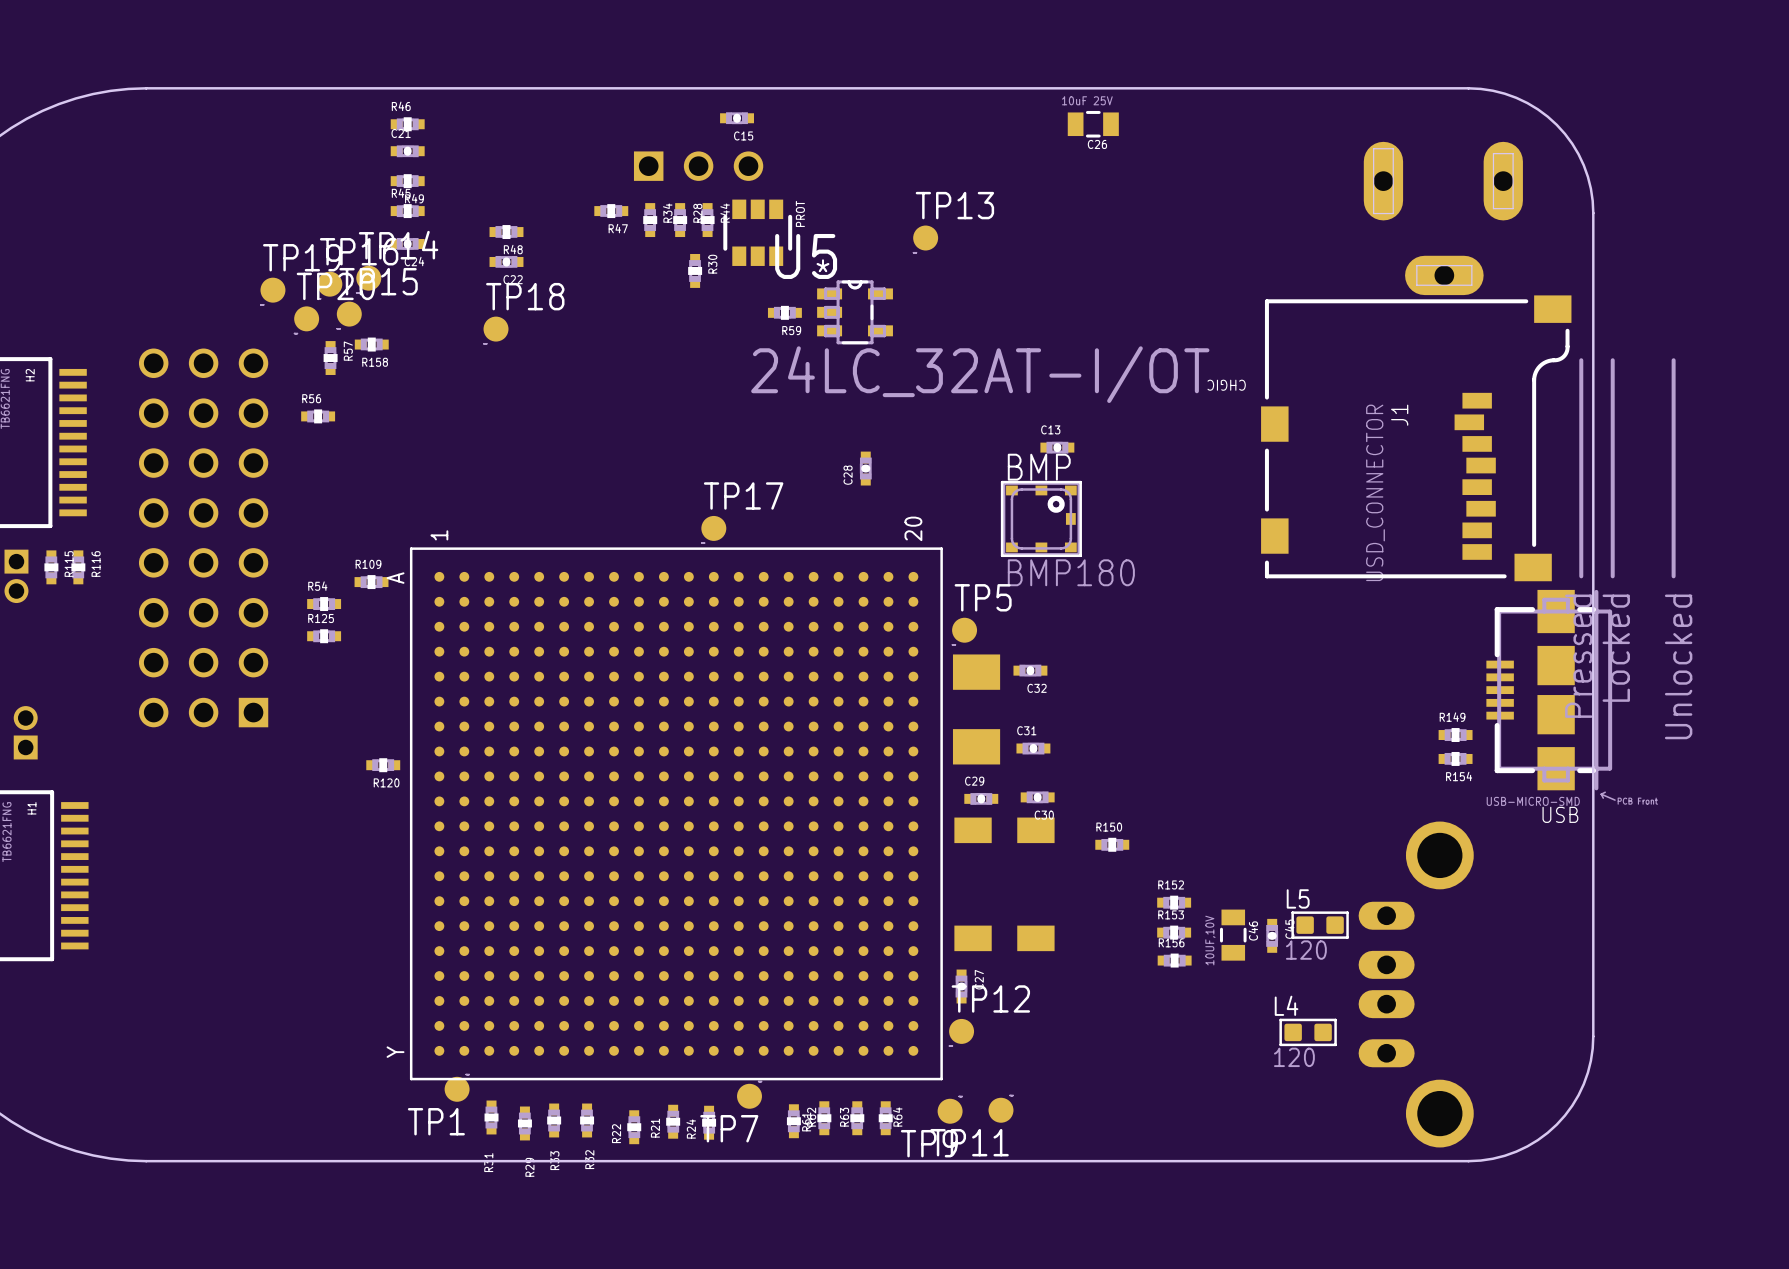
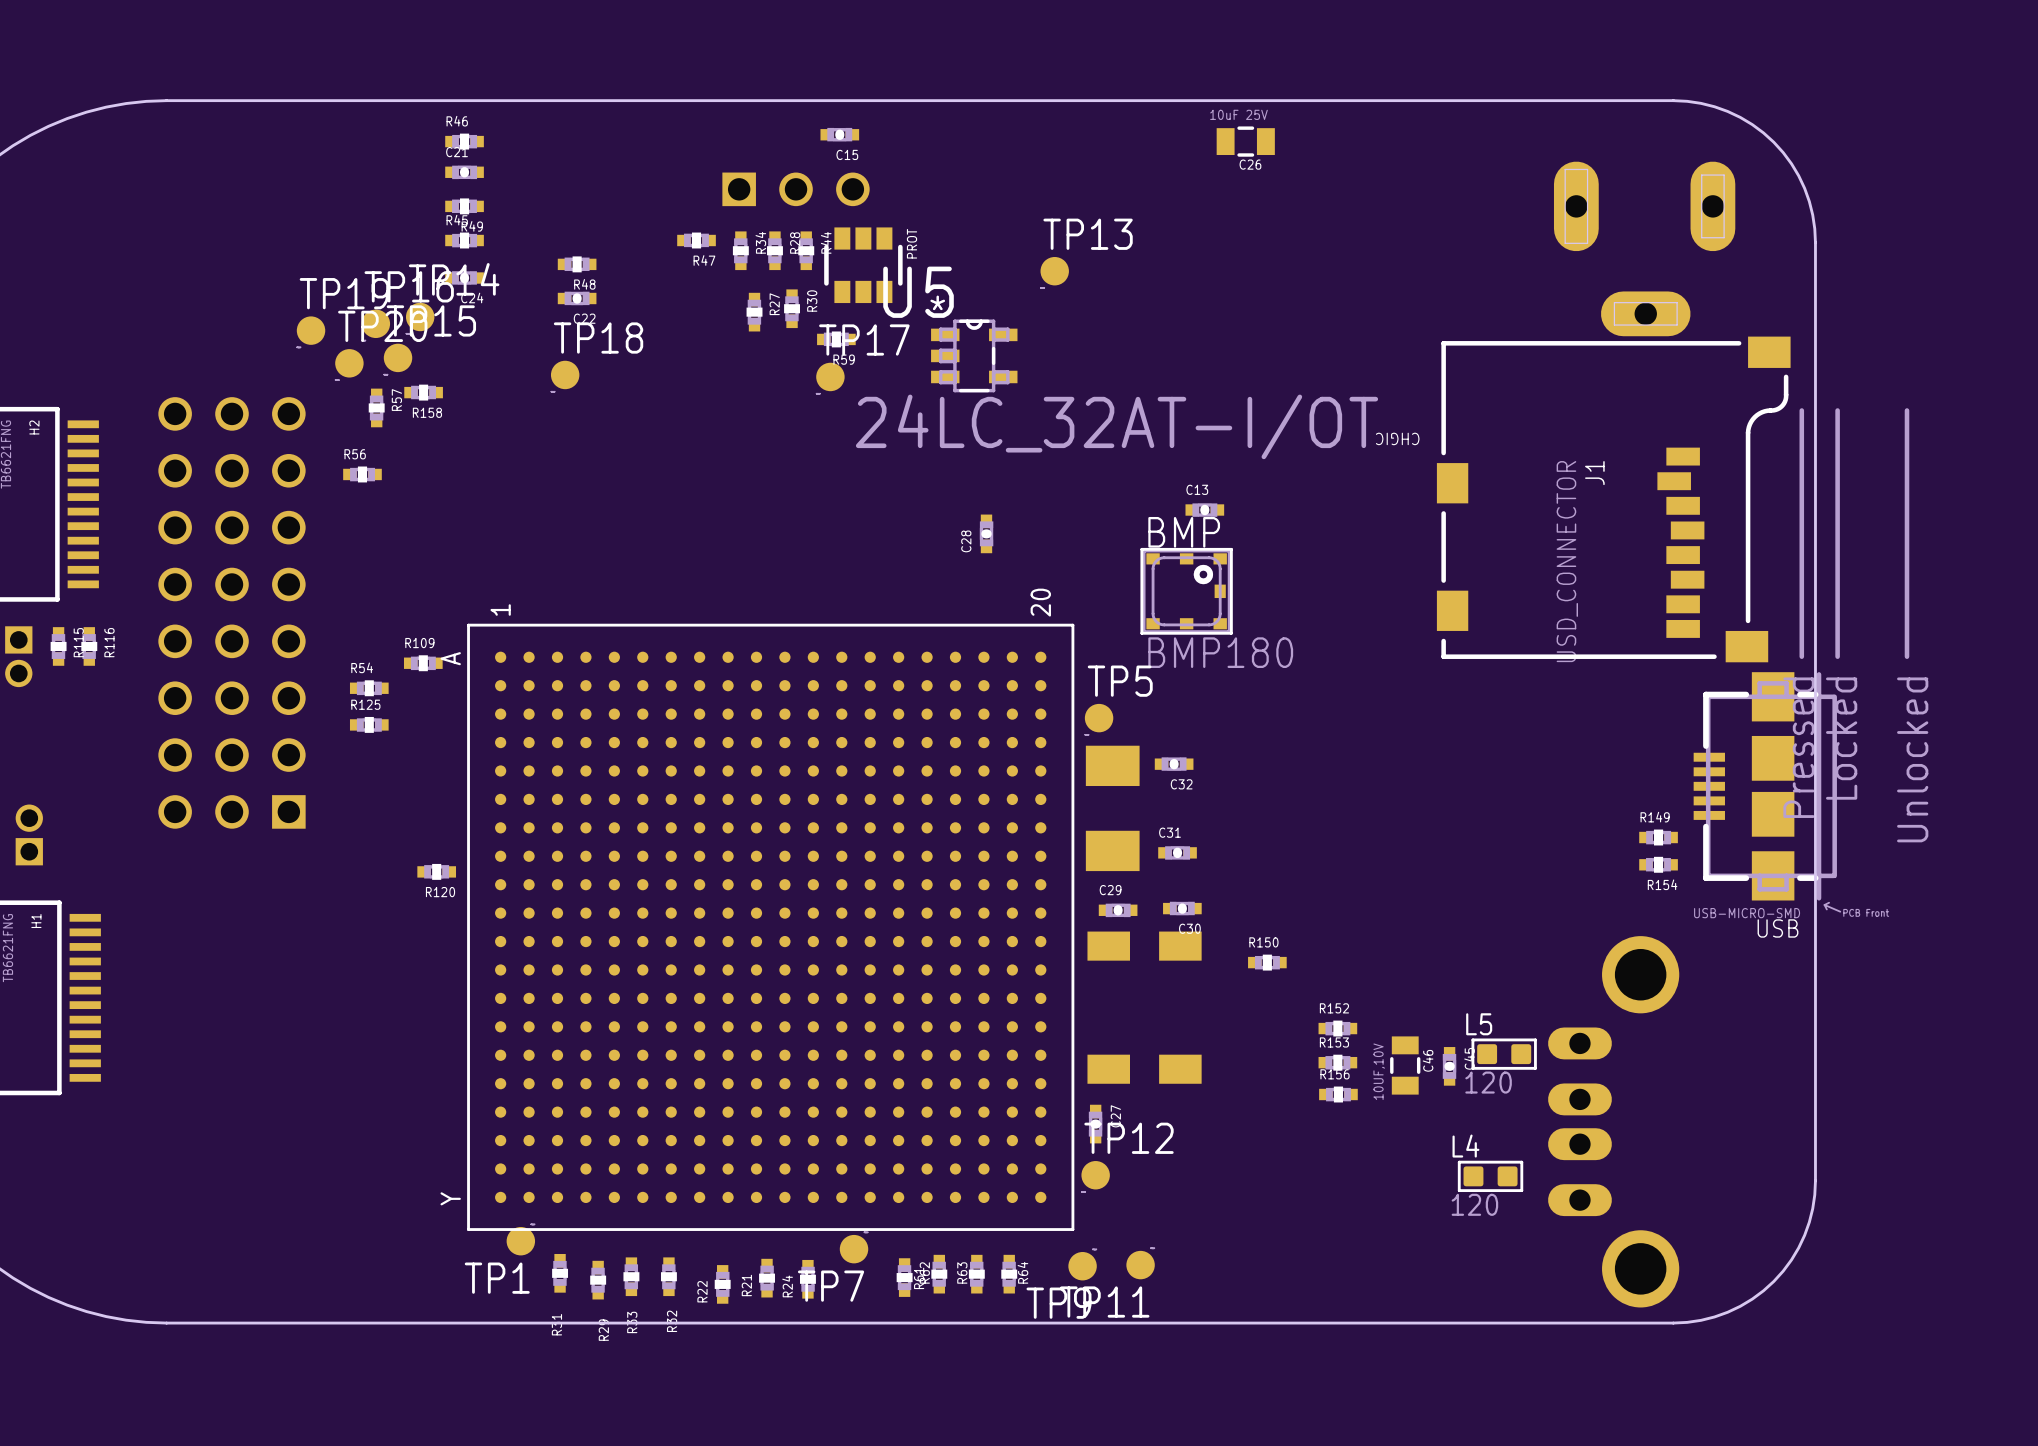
R27: none -> (754, 312)
R59 position: (784, 312) -> (836, 339)
TP17 position: (713, 528) -> (830, 376)

